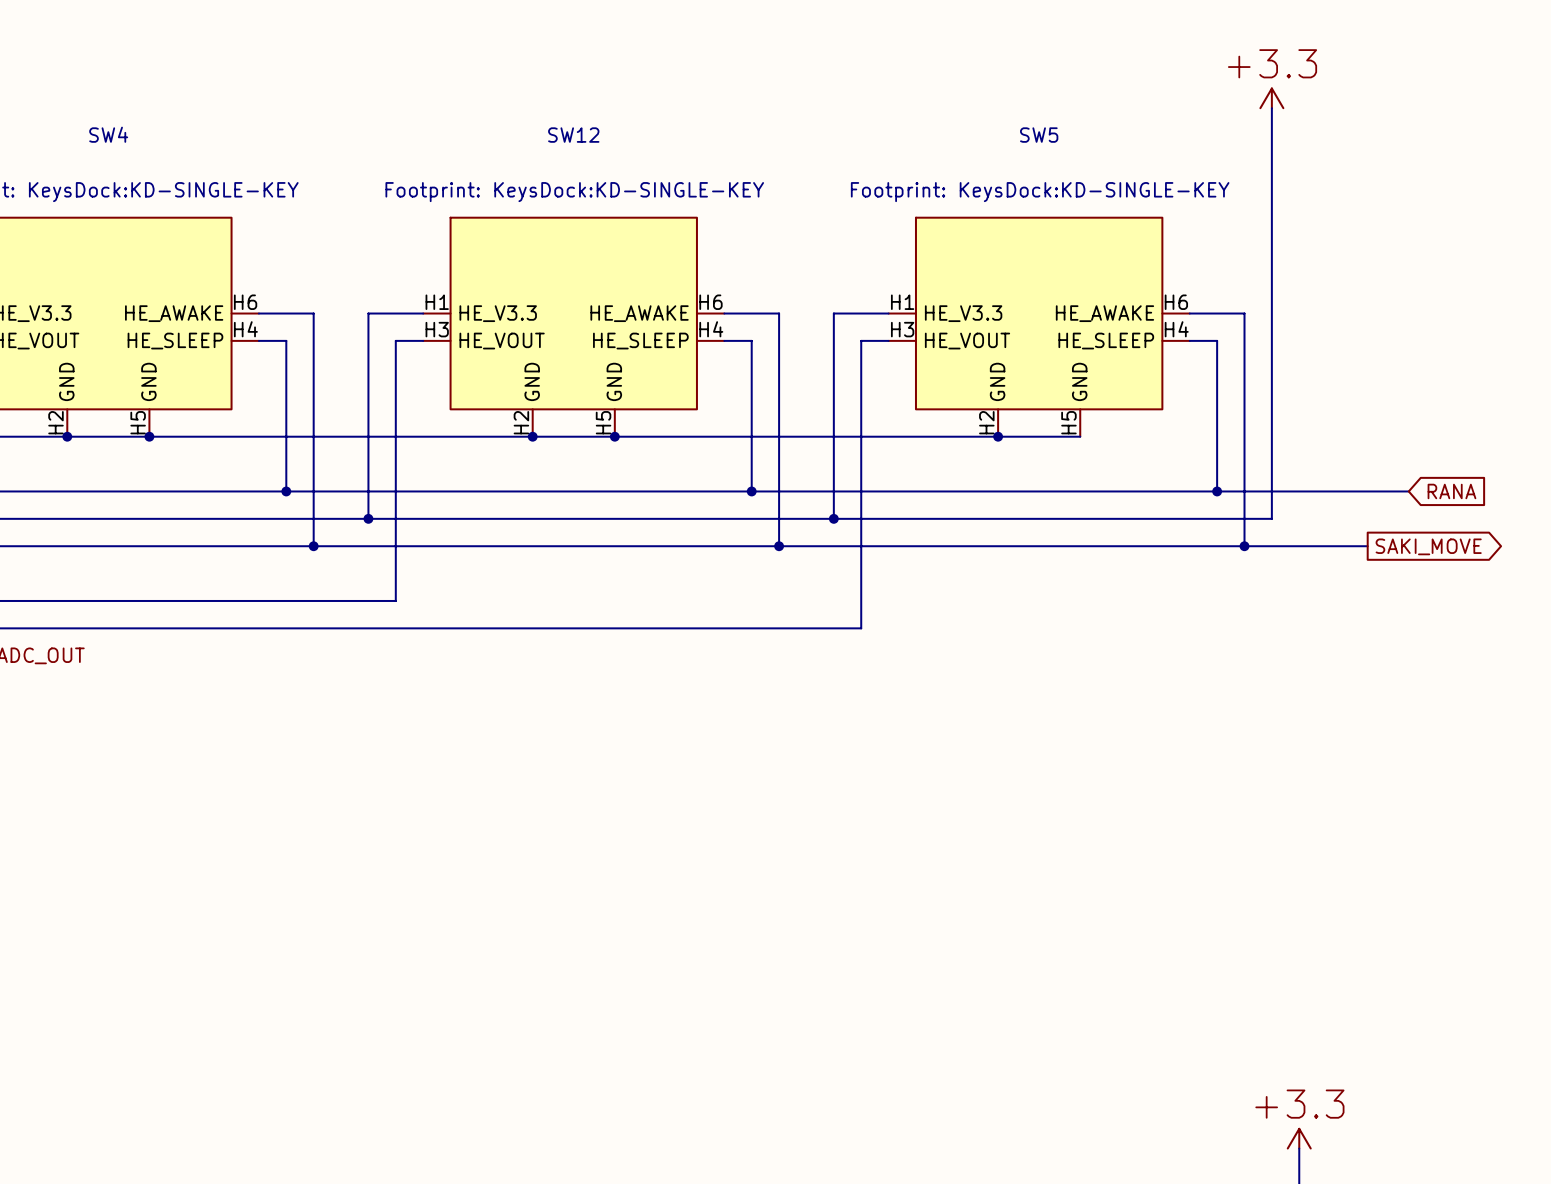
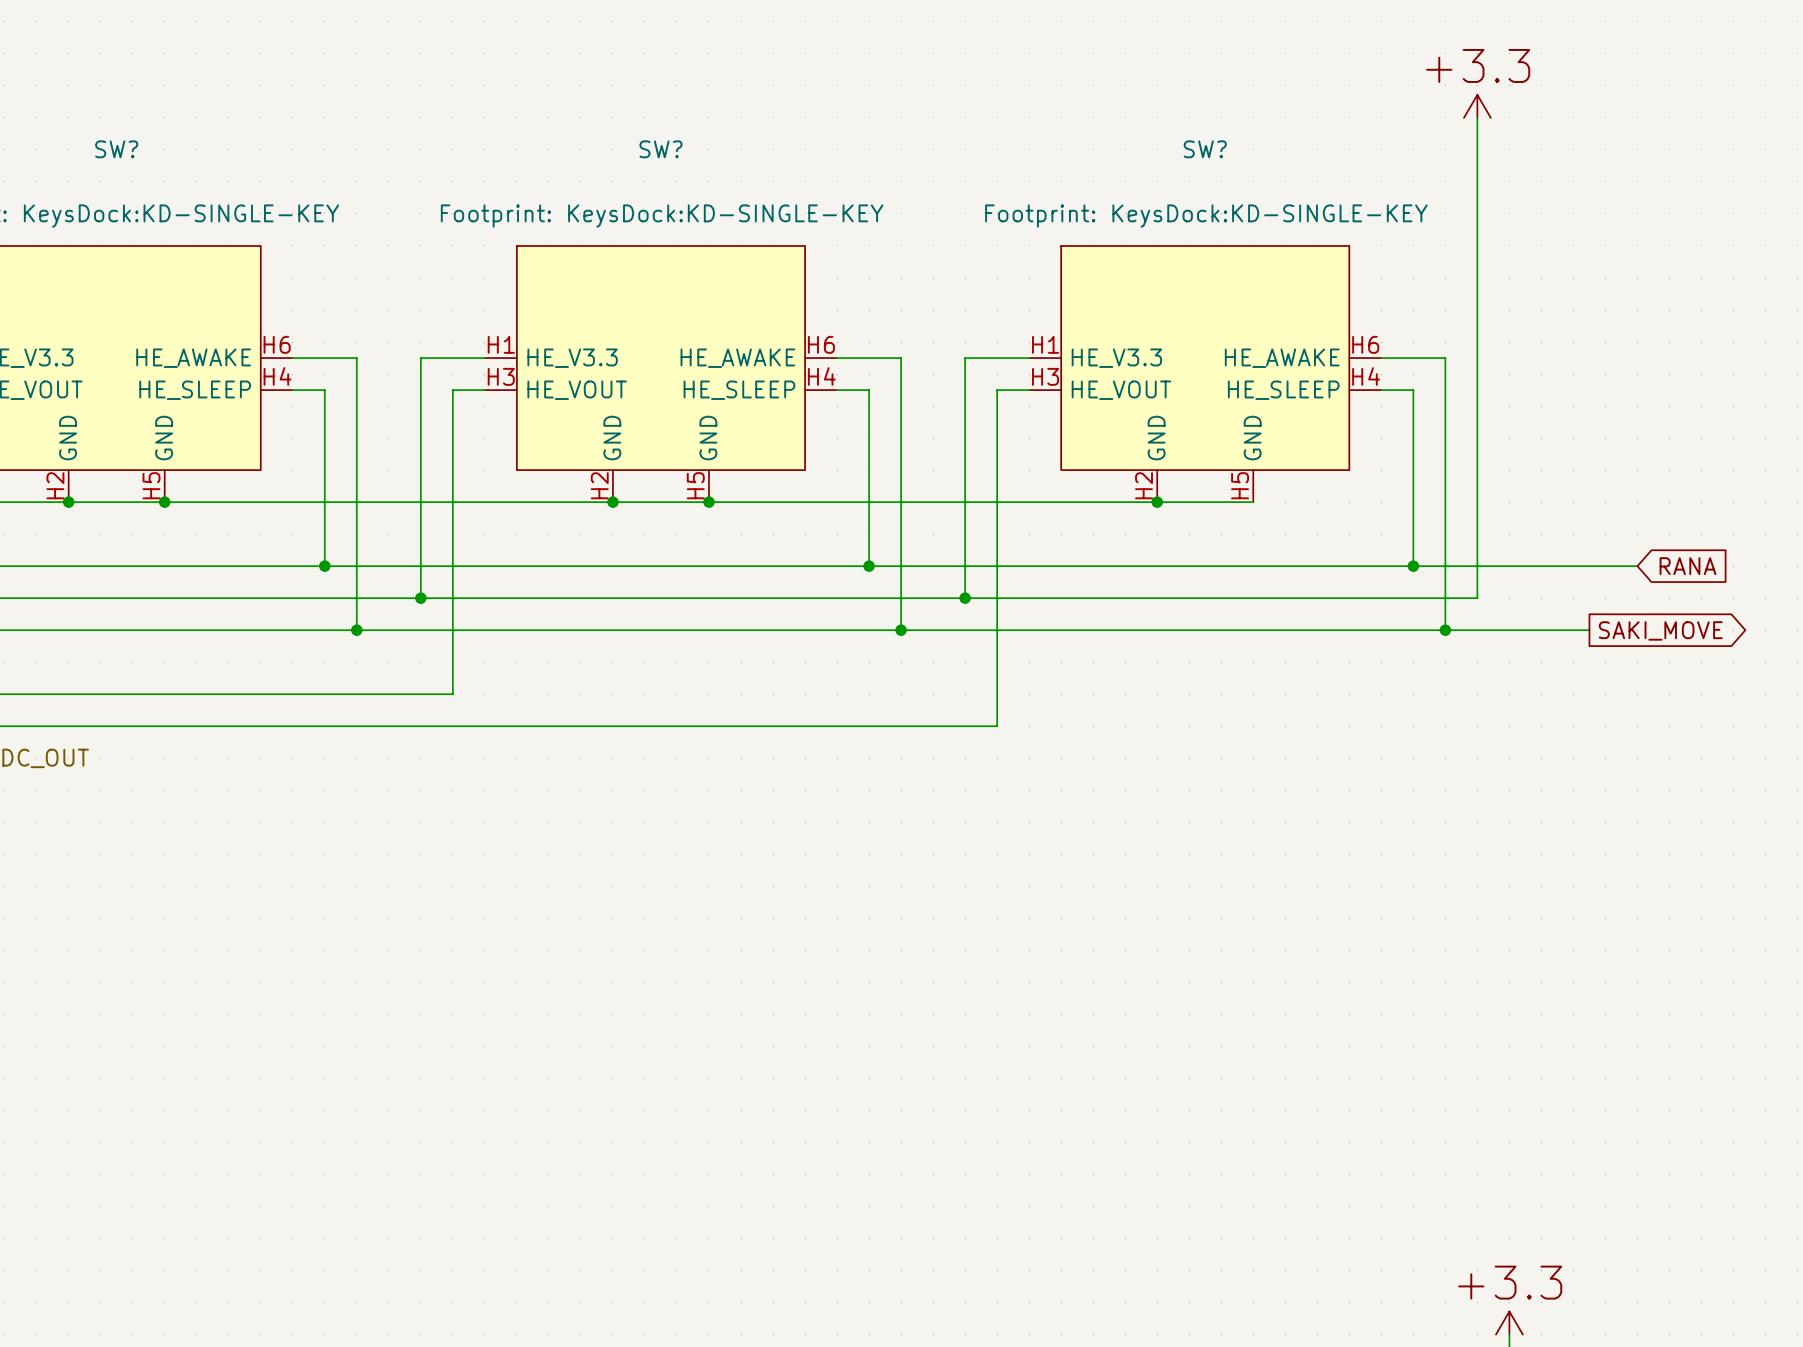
SW4 name: SW4 (108, 134) -> SW? (116, 149)
SW12 name: SW12 (573, 135) -> SW? (660, 149)
SW5 name: SW5 (1039, 135) -> SW? (1205, 149)

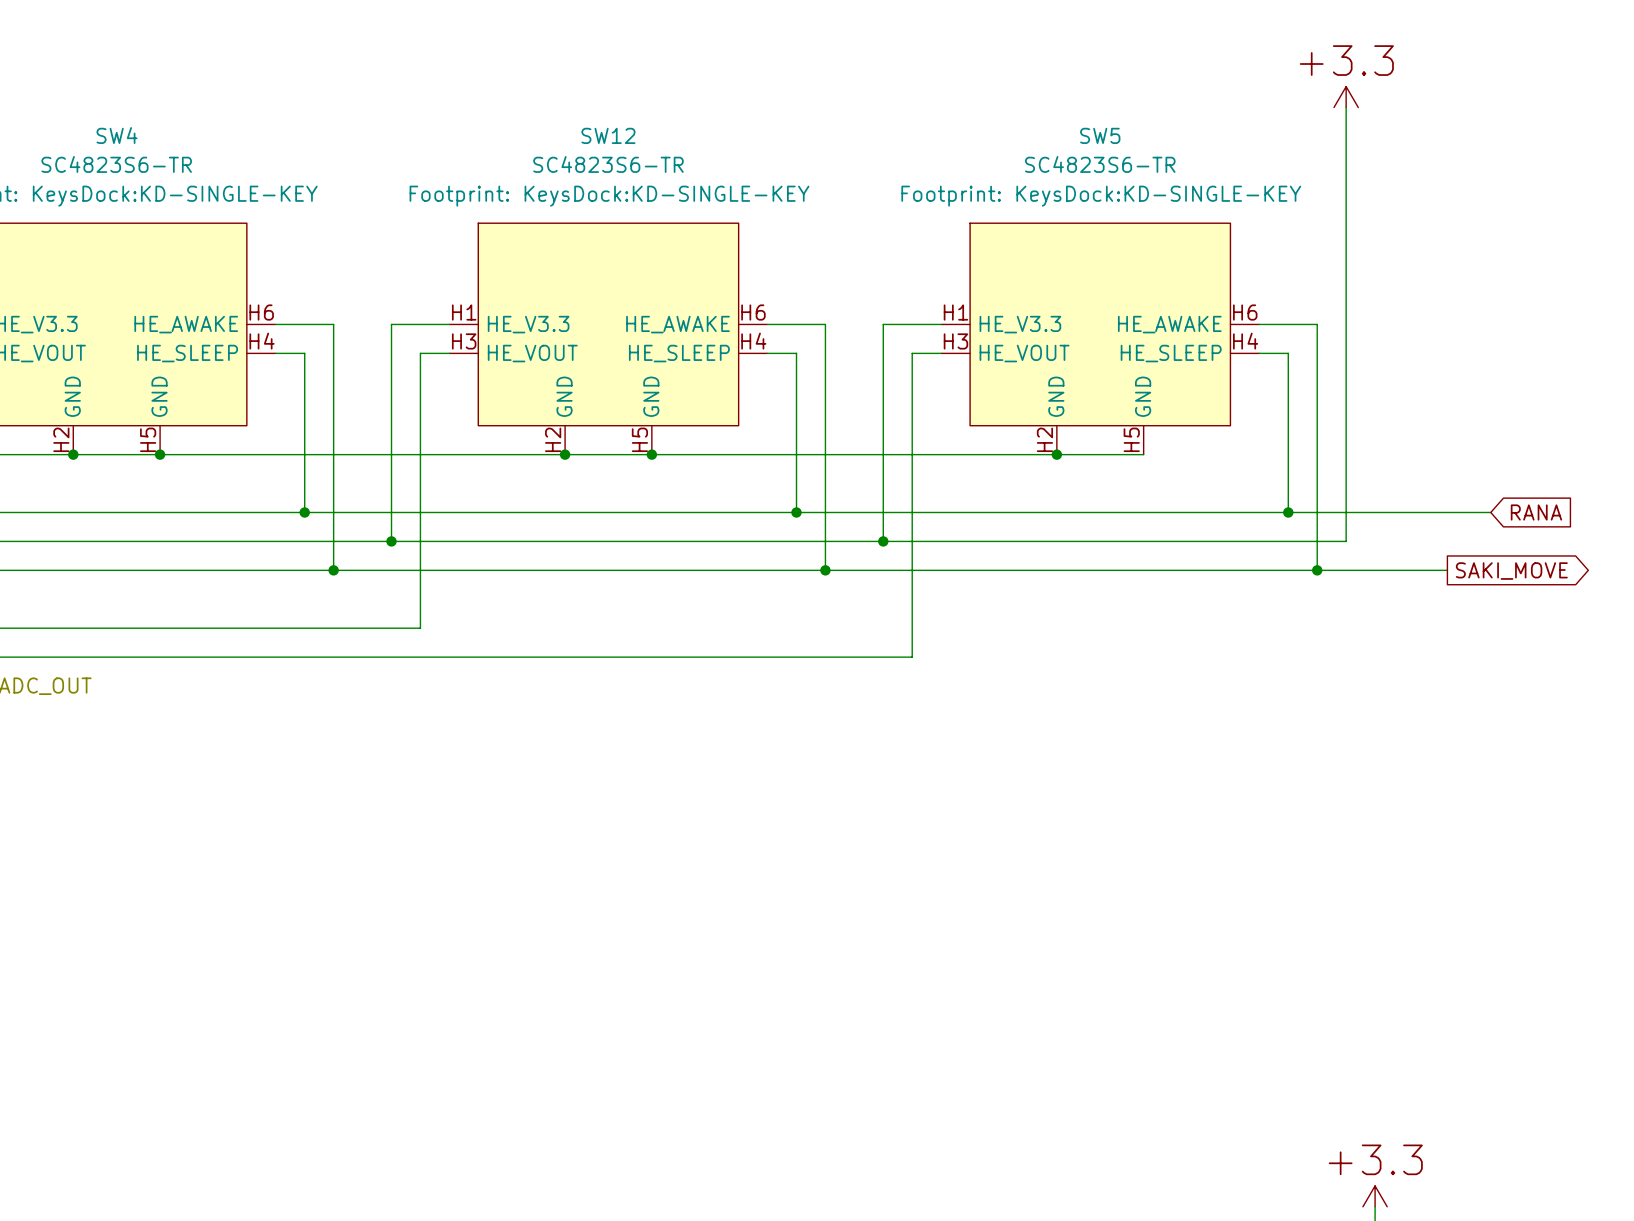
SW? name: SW? (116, 149) -> SW4 (117, 135)
SW? name: SW? (660, 149) -> SW12 (608, 135)
SW? name: SW? (1205, 149) -> SW5 (1100, 135)
SW? value: none -> SC4823S6-TR (116, 164)
SW? value: none -> SC4823S6-TR (608, 164)
SW? value: none -> SC4823S6-TR (1100, 164)

